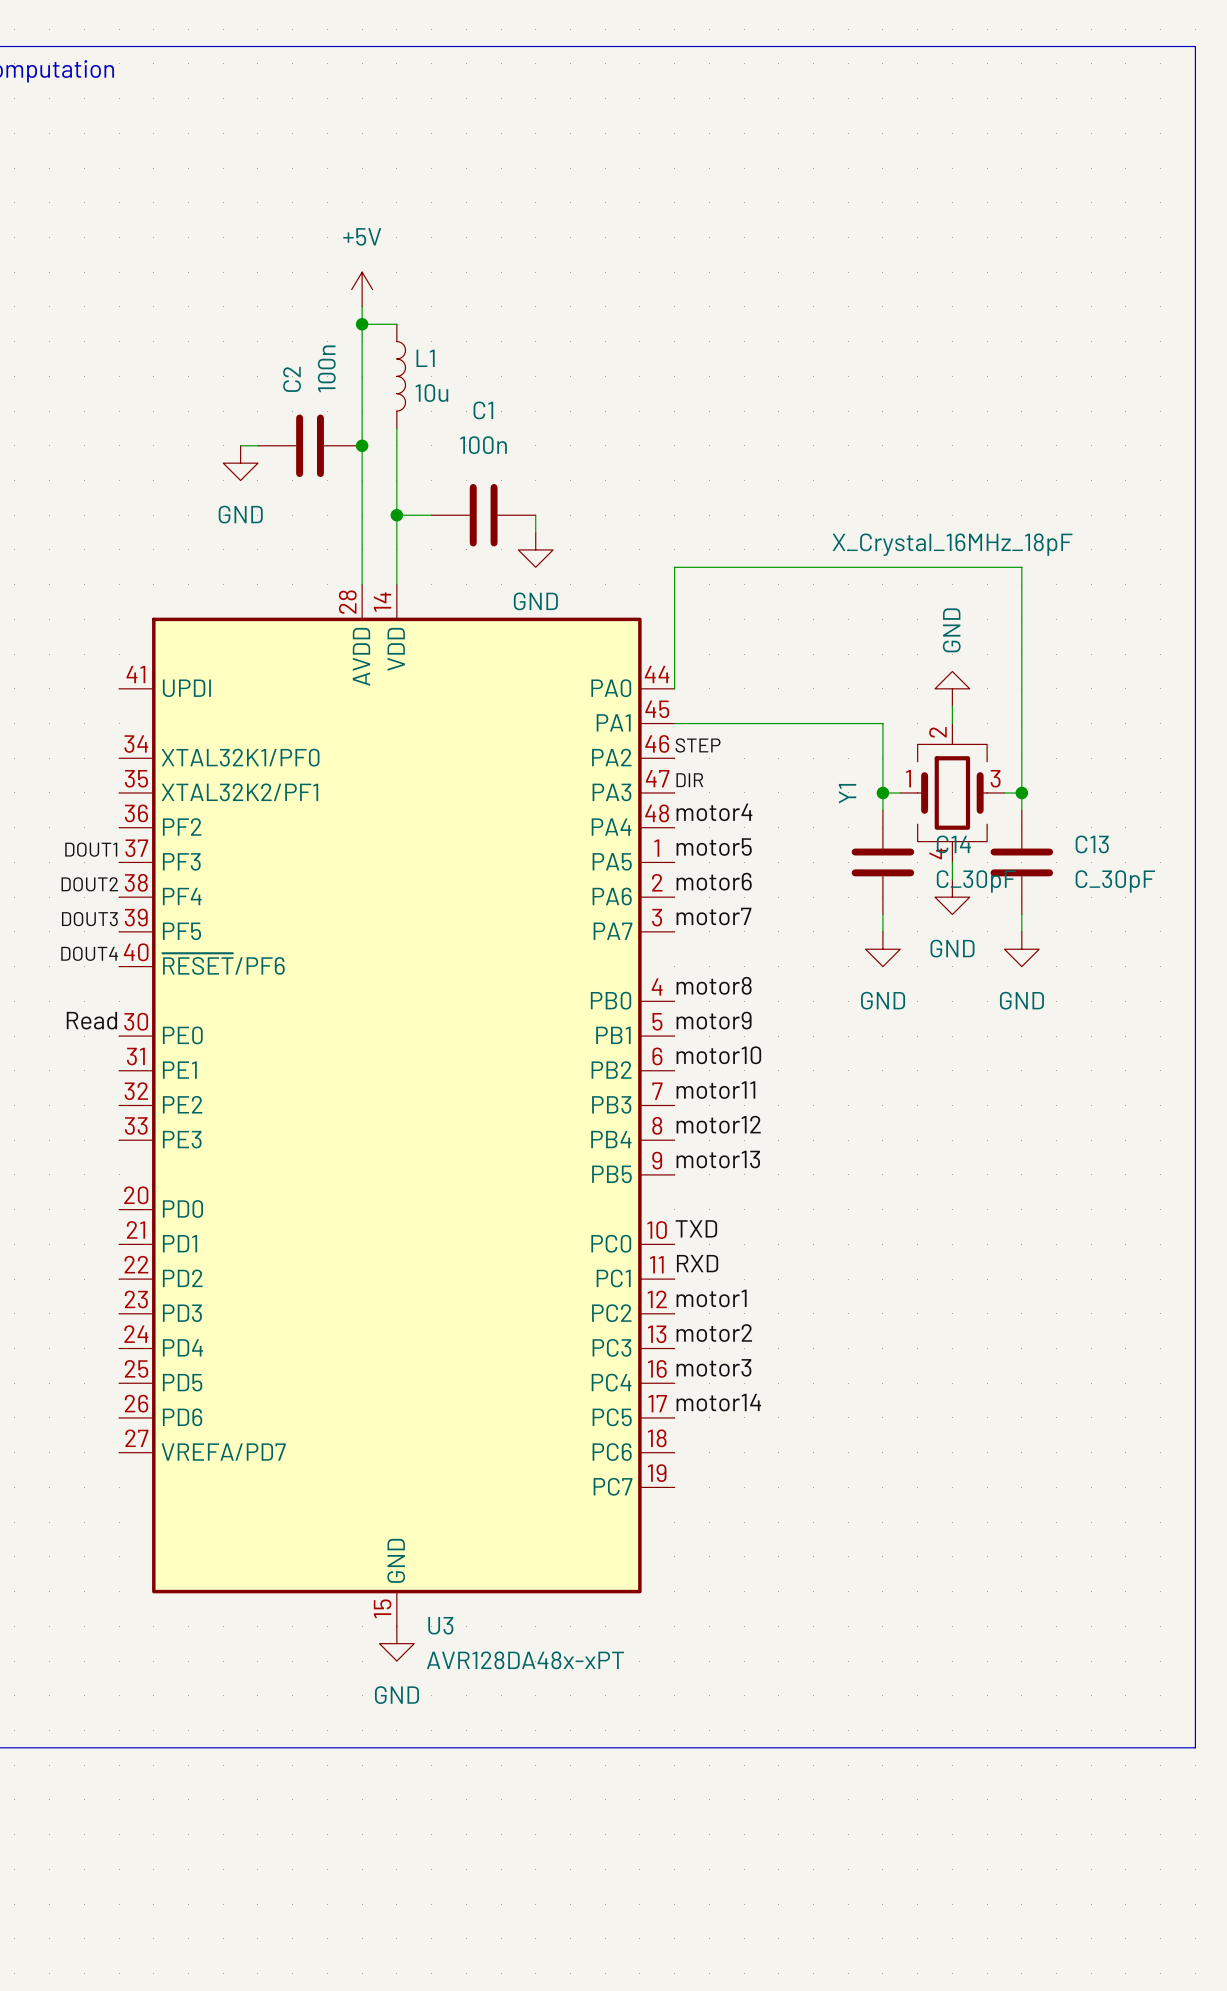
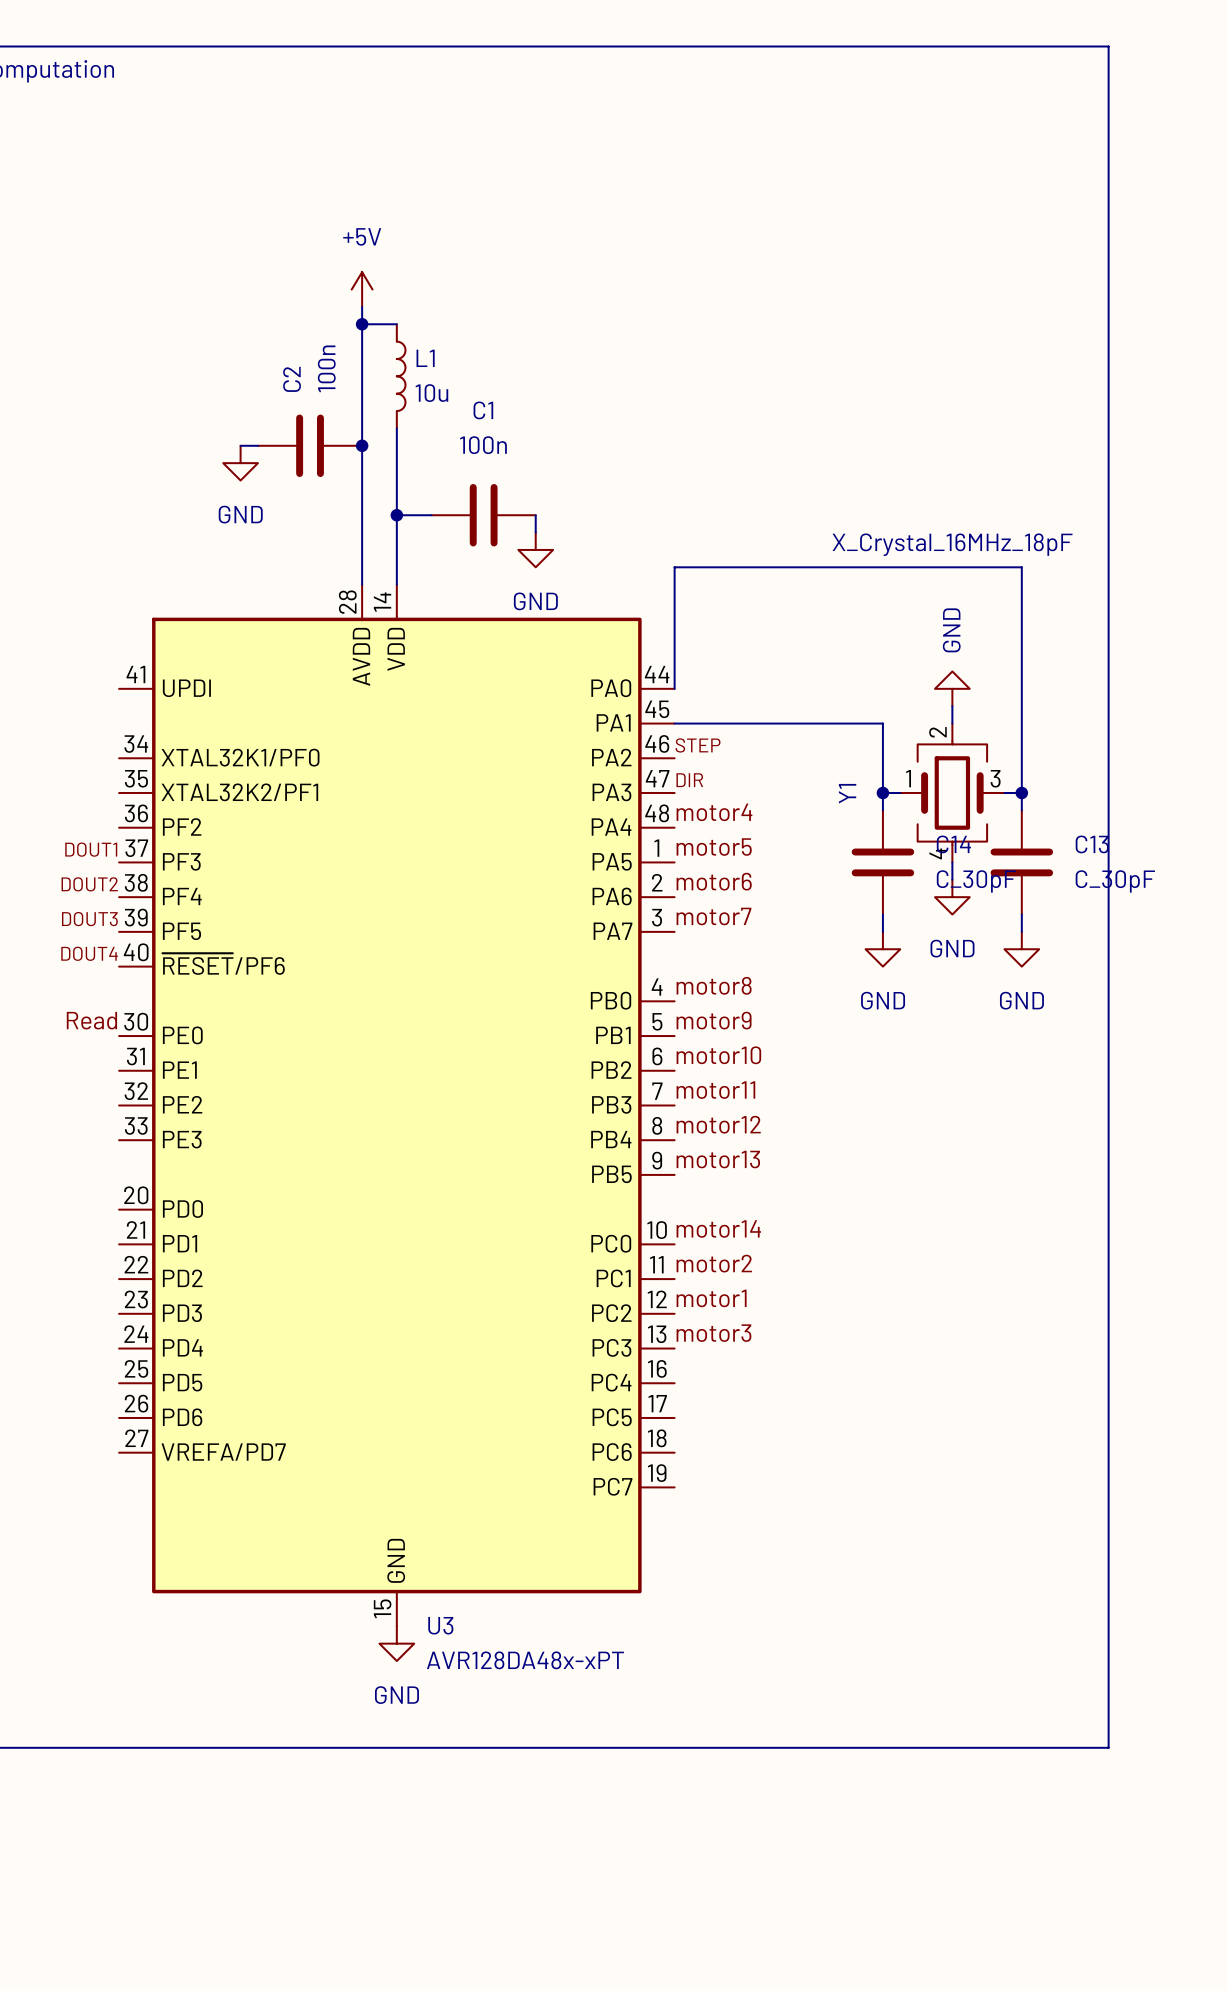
line: (1108, 46) (1195, 46) (1195, 1747) (1108, 1747) -> (1108, 46) (1108, 1747)
label: TXD (696, 1228) -> motor14 (718, 1228)
label: RXD (697, 1263) -> motor2 (714, 1263)
label: motor2 (714, 1333) -> motor3 (713, 1333)
label: motor3 (713, 1367) -> none
label: motor14 (718, 1402) -> none

